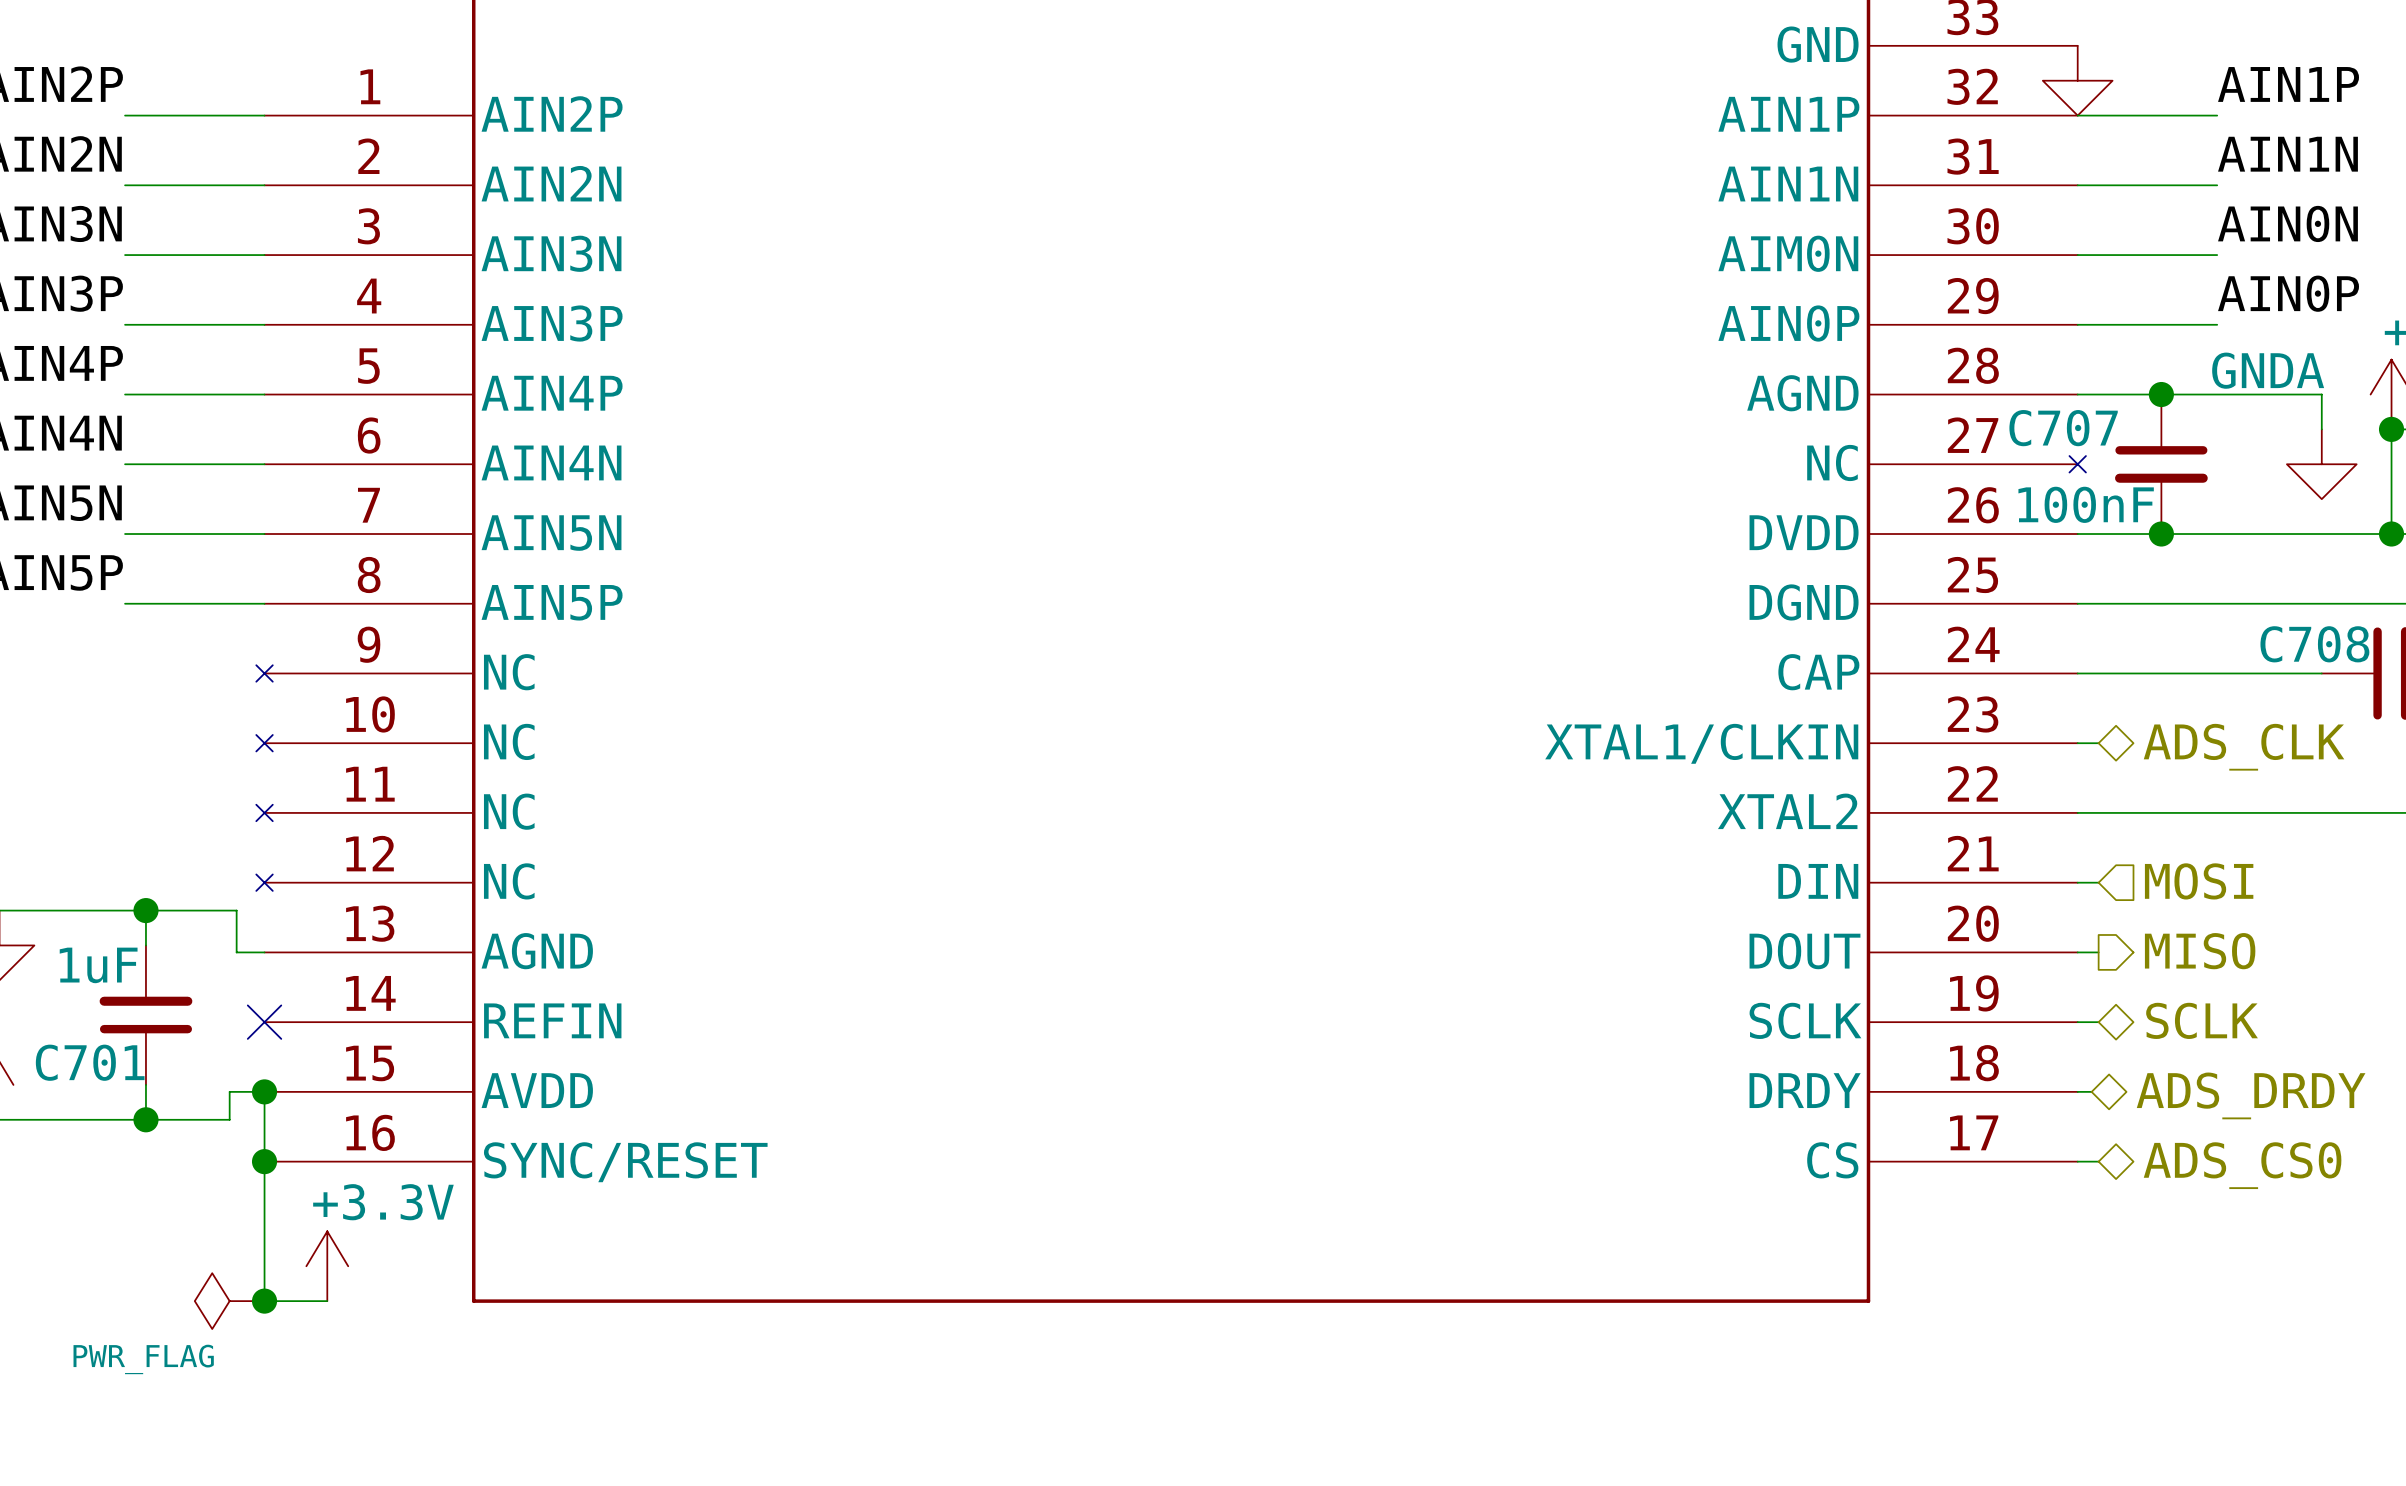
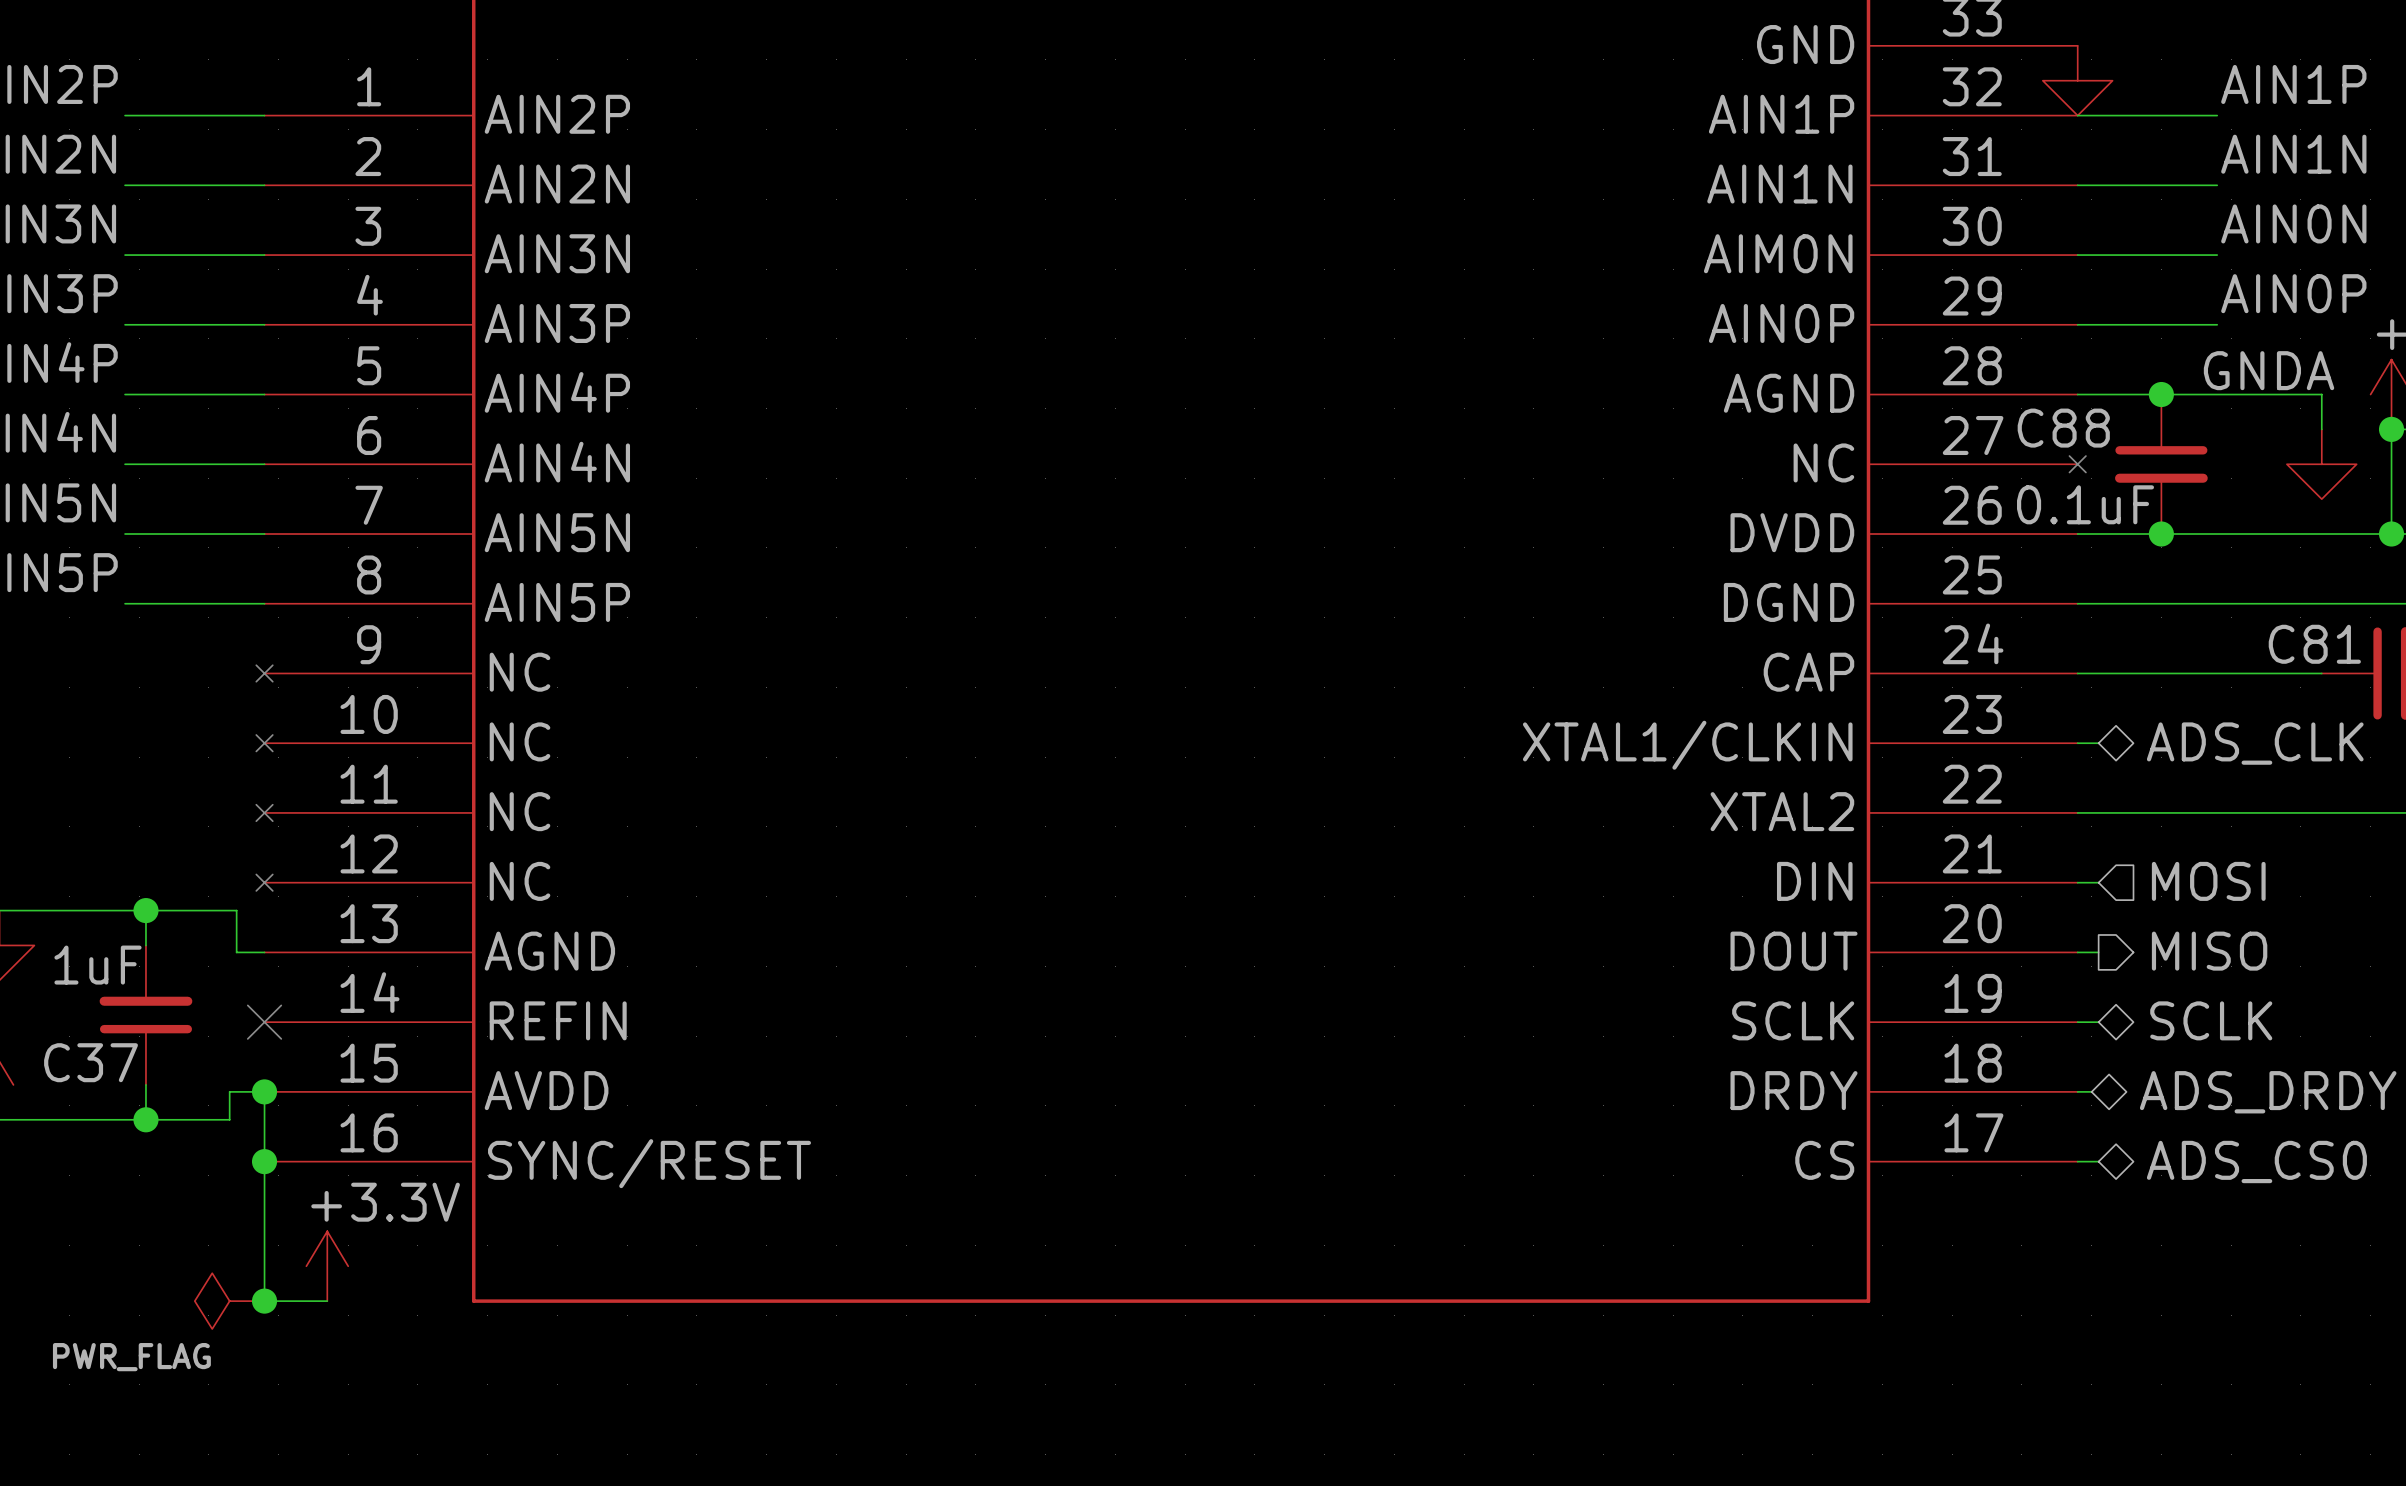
C707 name: C707 (2063, 428) -> C88 (2063, 428)
C707 value: 100nF (2086, 504) -> 0.1uF (2085, 504)
C708 name: C708 (2314, 644) -> C81 (2314, 644)
C701 name: C701 (90, 1062) -> C37 (91, 1062)

